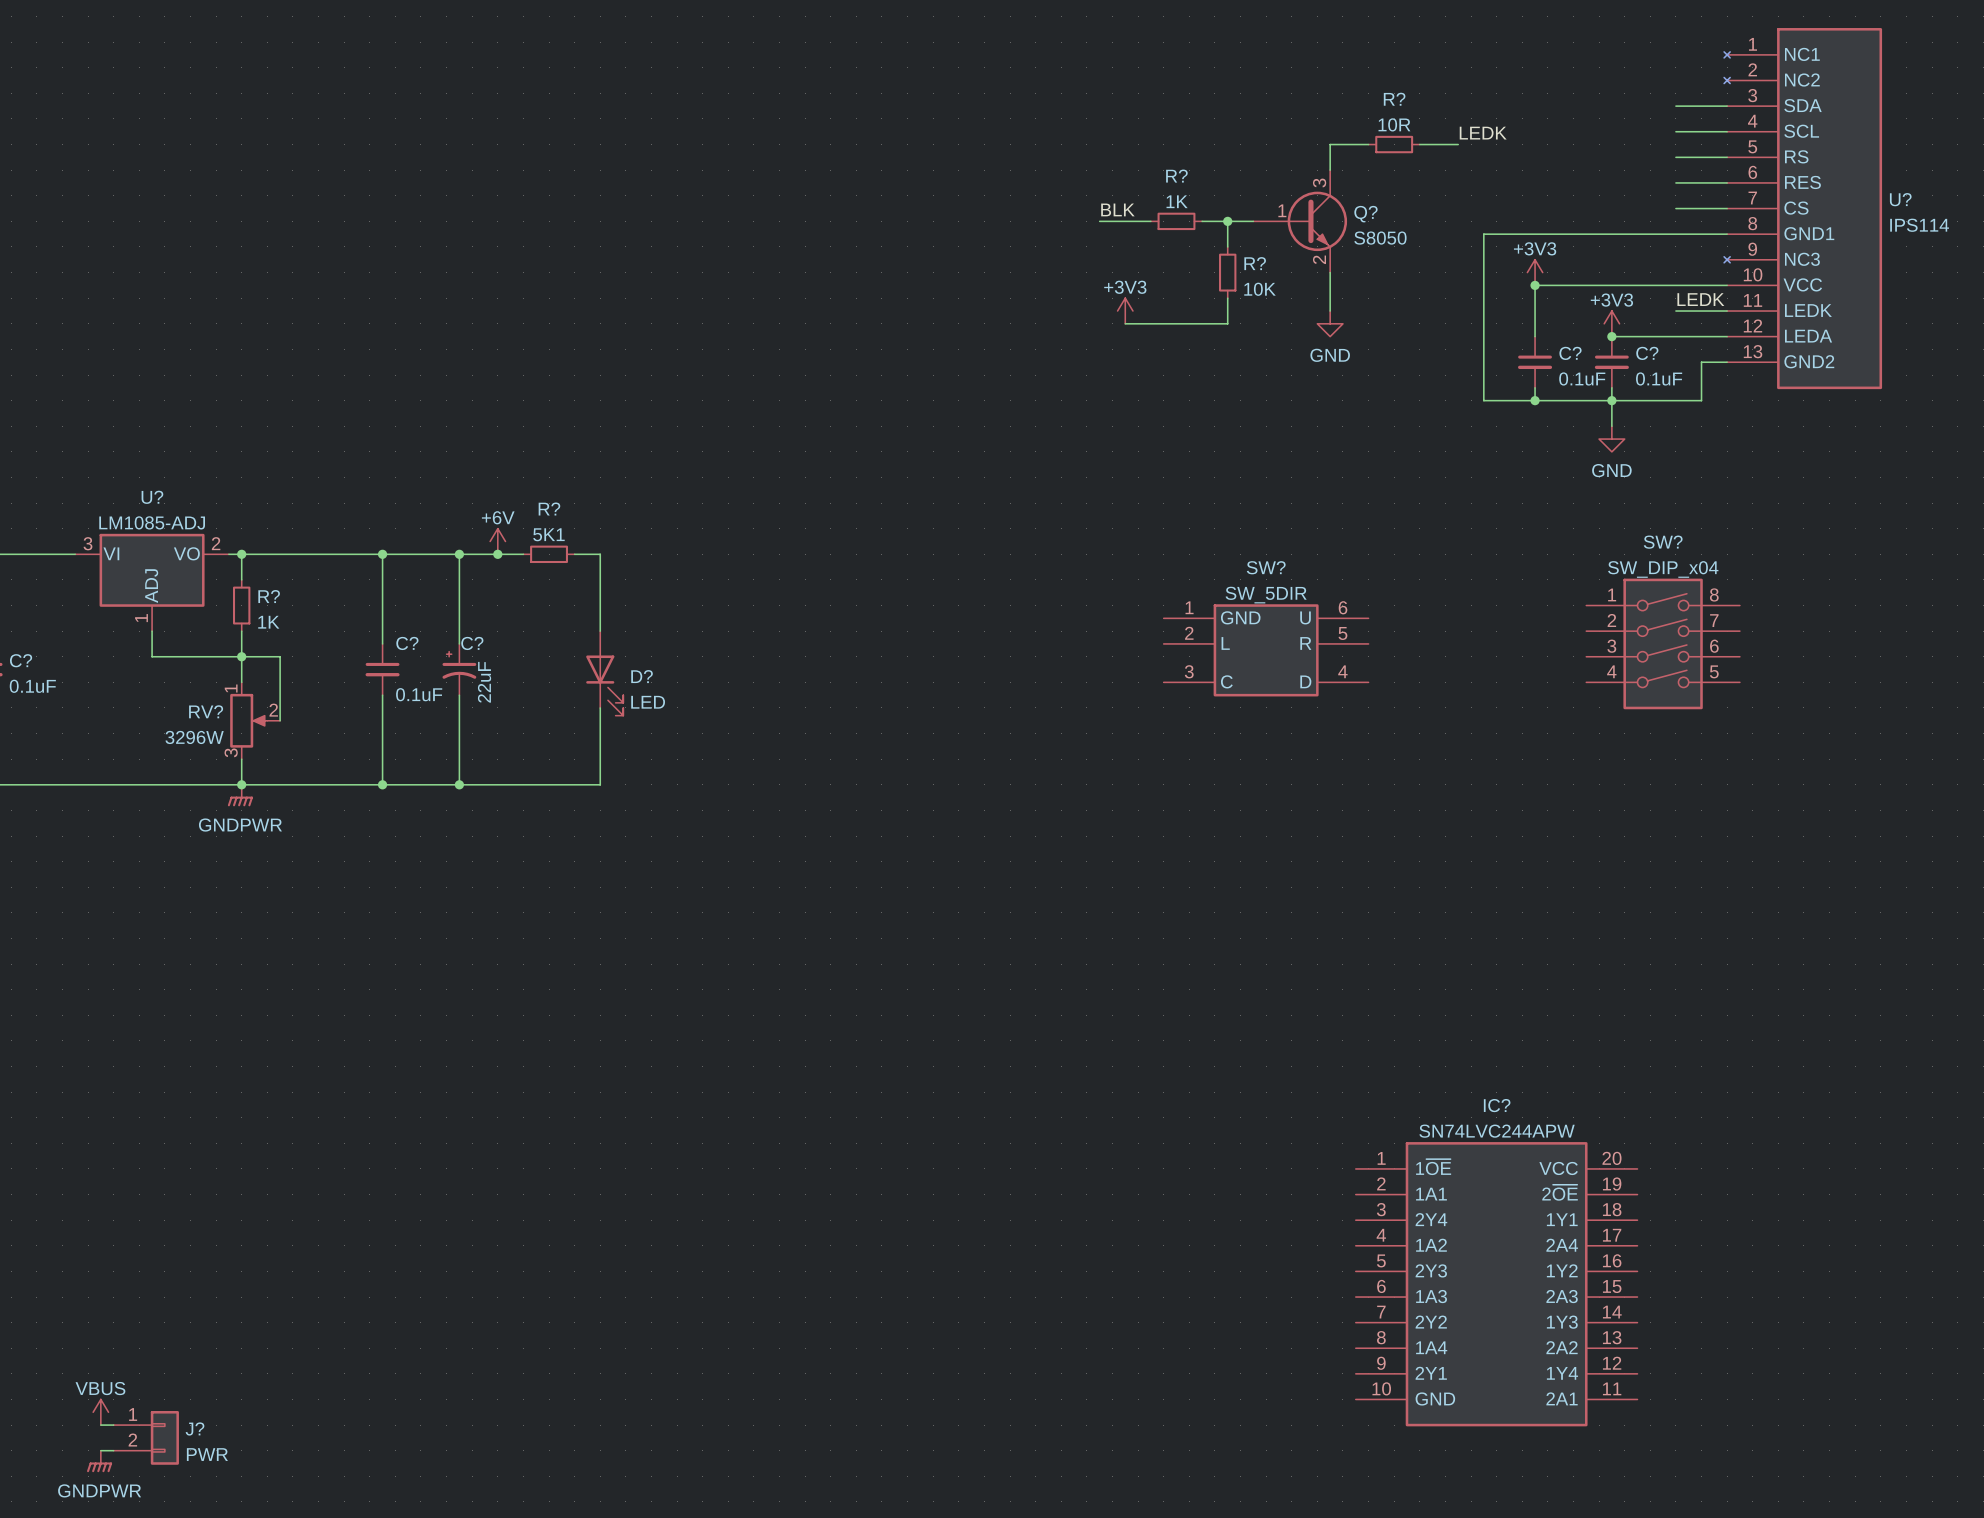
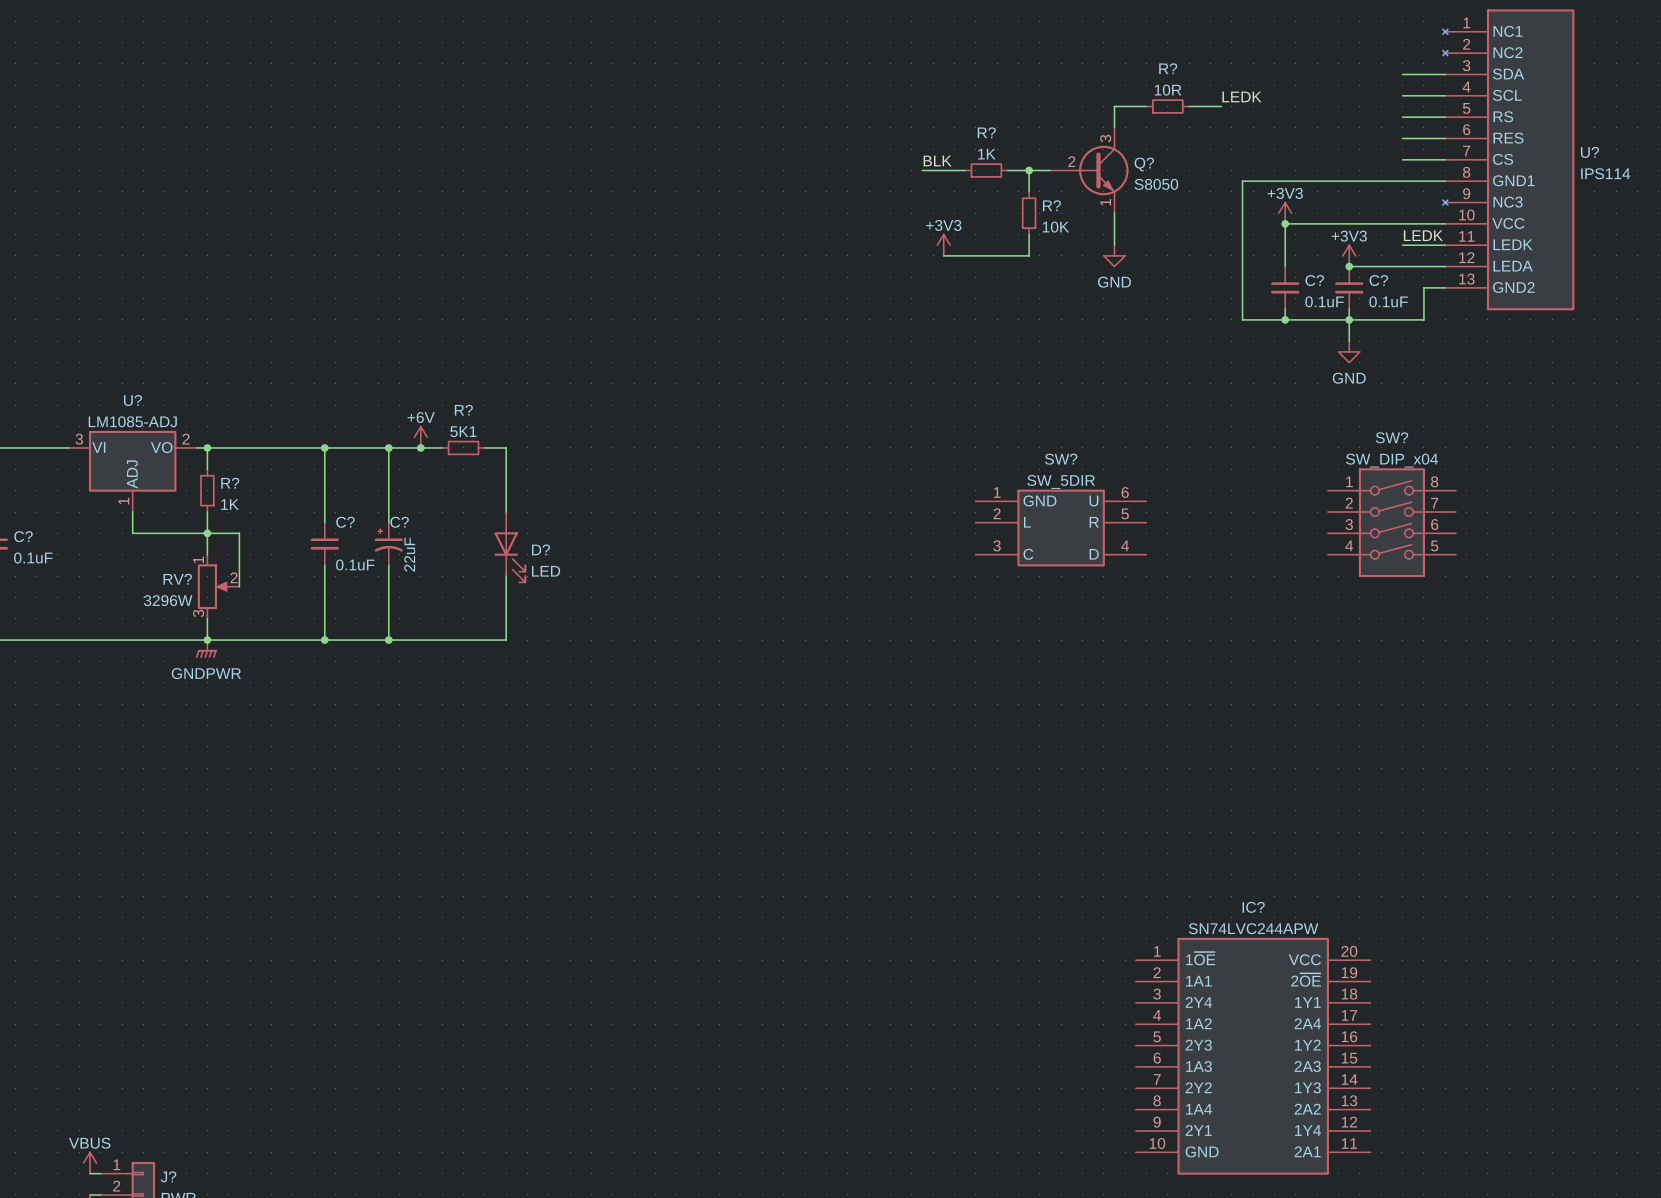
Q? symbol: [1253, 170, 1348, 273] -> [1050, 127, 1129, 214]

